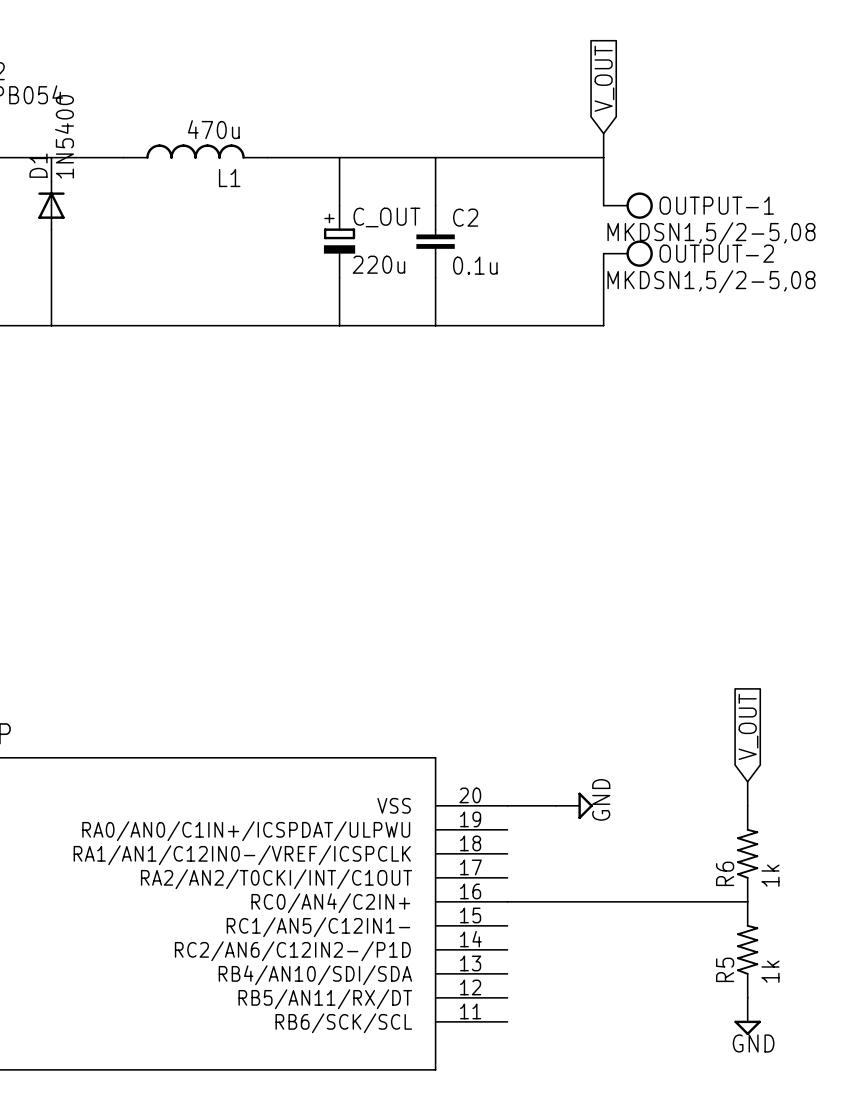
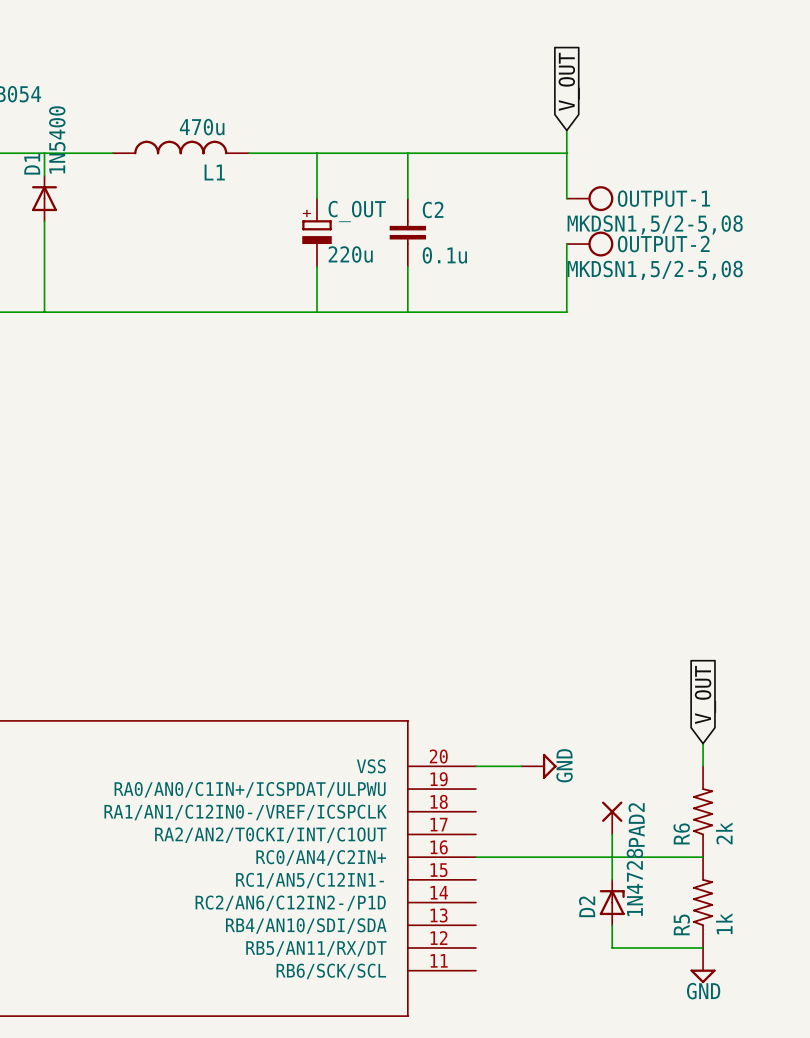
PAD2: none -> (612, 817)
R6 value: 1k (770, 875) -> 2k (724, 833)
wire: none -> (612, 834) (612, 879)
D2: none -> 1N4728 (612, 902)
wire: none -> (612, 925) (612, 947) (703, 947)

